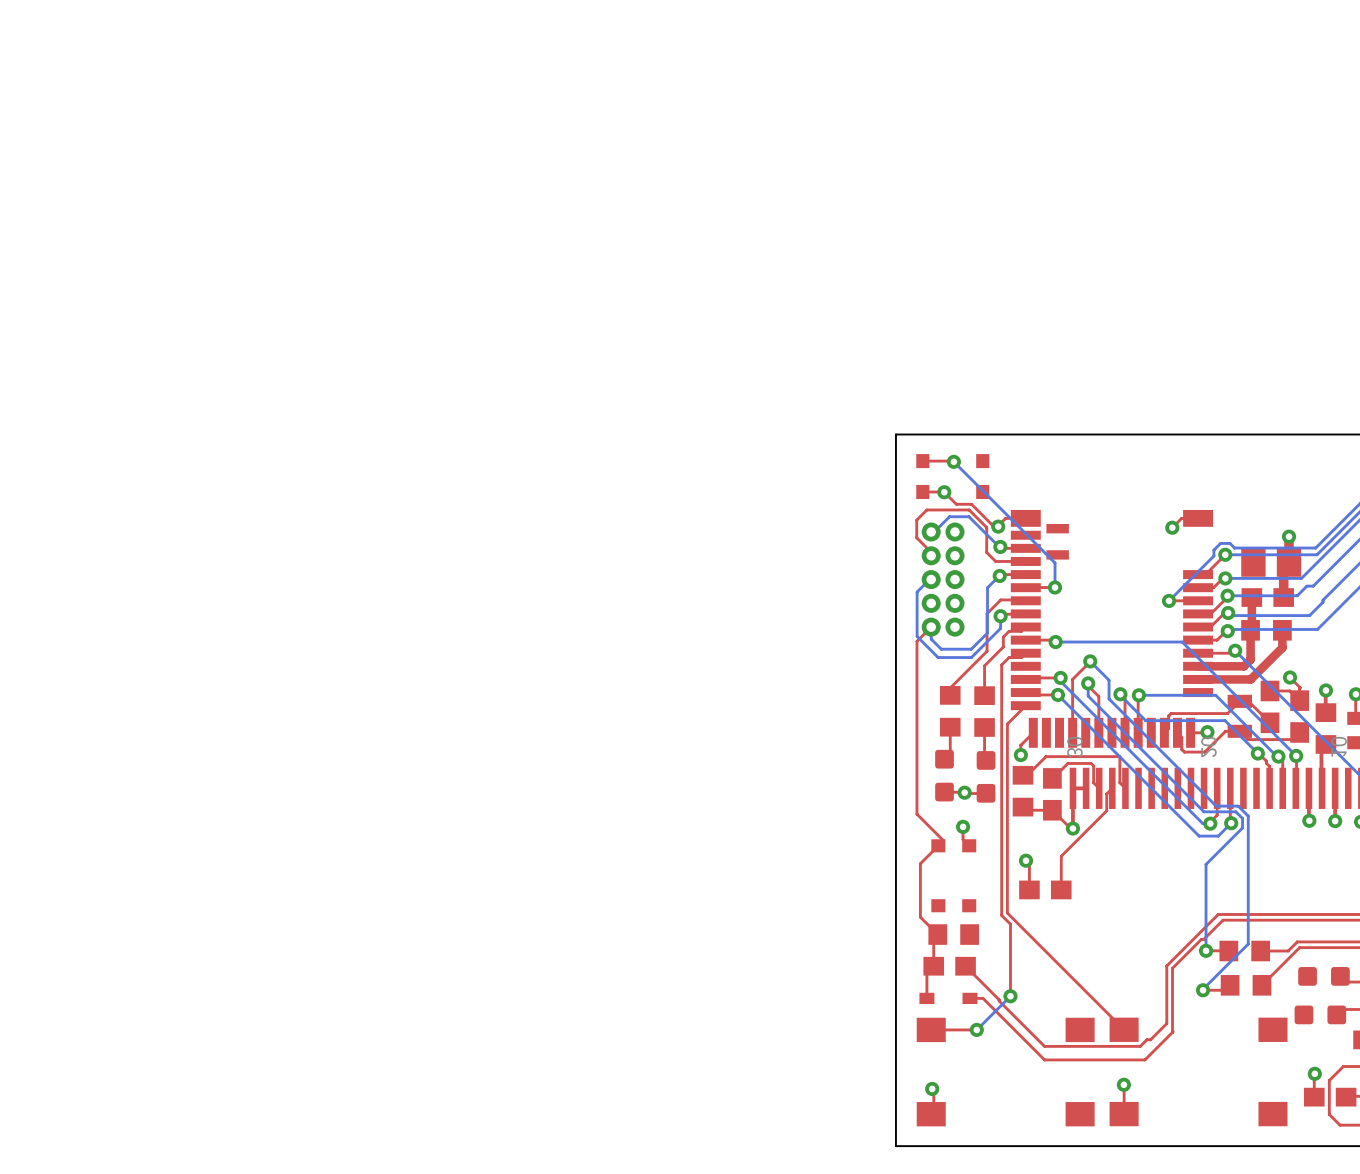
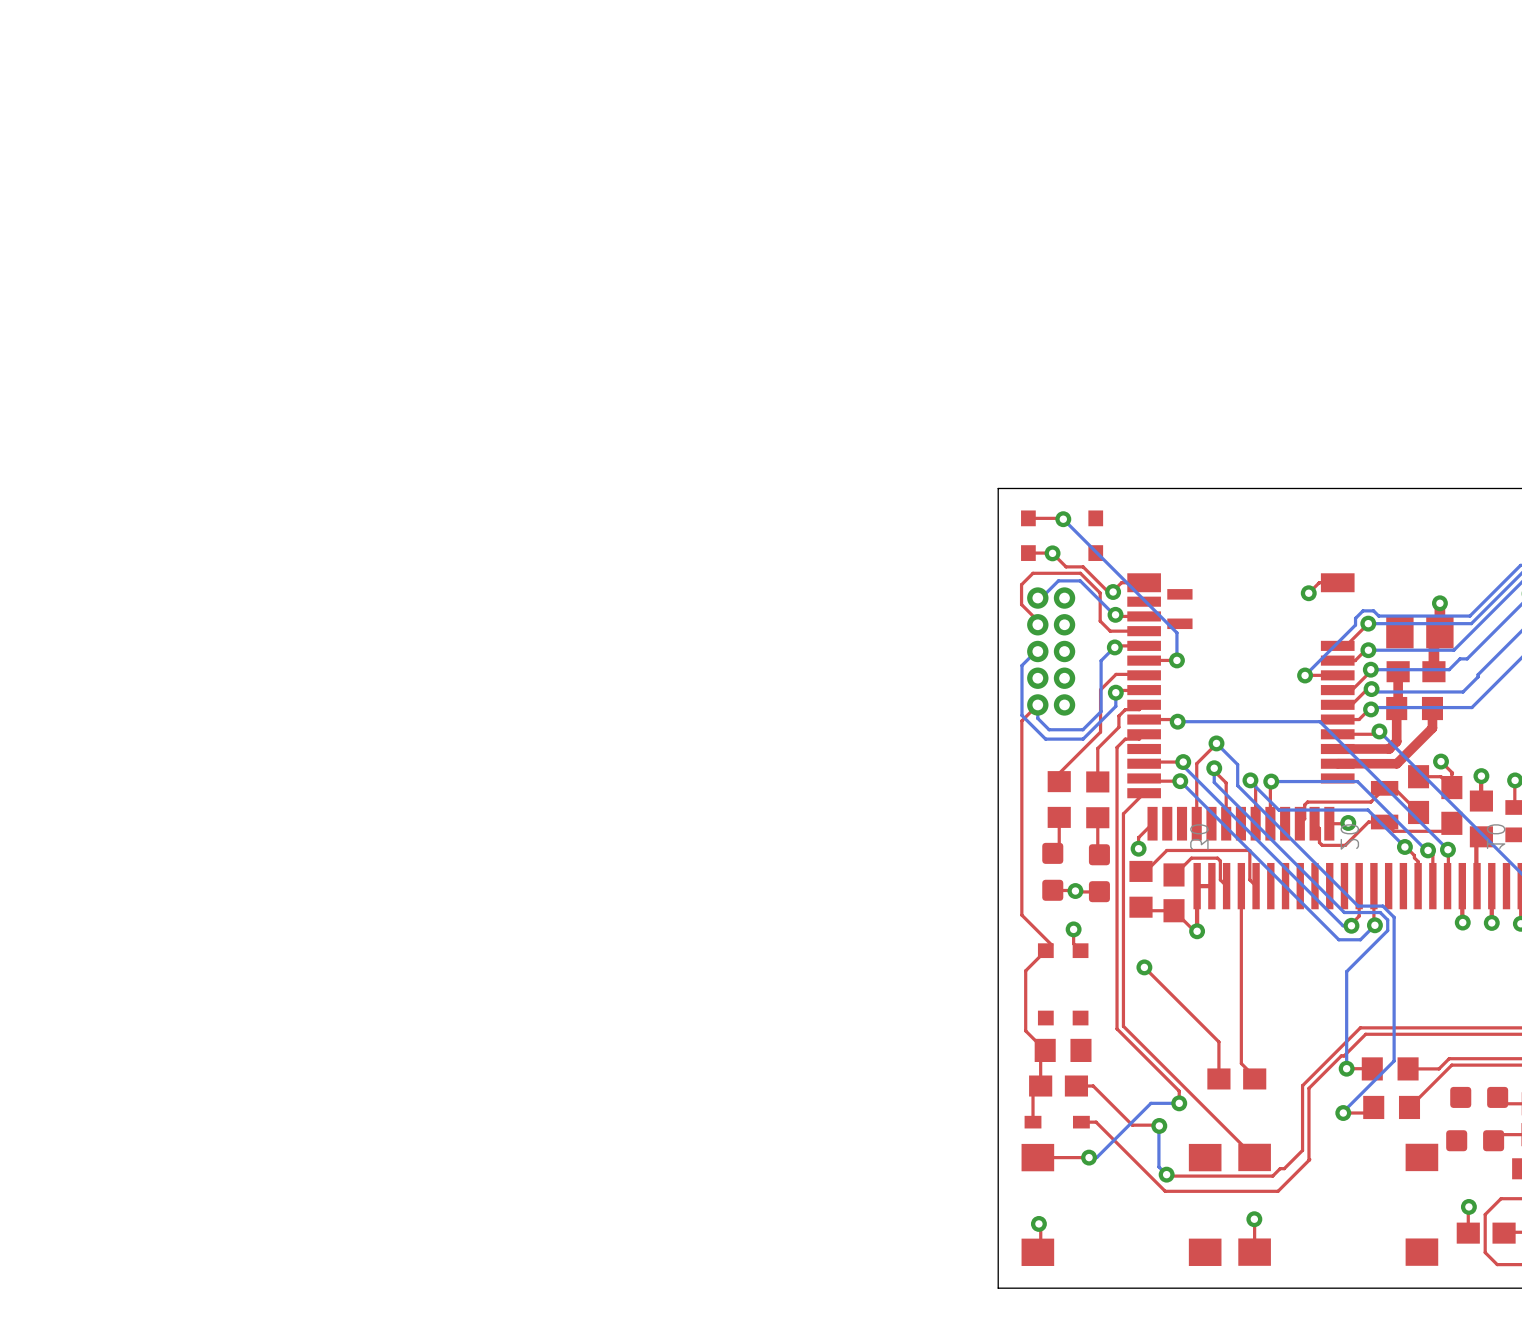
top track: (1112, 788) (1106, 793) (1106, 810) (1061, 856) (1061, 889) -> (1241, 886) (1241, 1063) (1254, 1078)
top track: (1029, 864) (1029, 889) -> (1148, 971) (1218, 1041) (1218, 1078)
part position: (1045, 889) -> (1236, 1078)
top track: (1010, 924) (1010, 996) -> (1126, 1038) (1179, 1091) (1179, 1103)
top track: (965, 966) (1044, 1046) -> (1076, 1086) (1093, 1086) (1132, 1125) (1159, 1125)
via: none -> (1179, 1103)
bottom track: (1010, 996) (976, 1029) -> (1179, 1103) (1150, 1103) (1096, 1157) (1089, 1157)
via: (1010, 996) -> none
bottom track: none -> (1159, 1125) (1158, 1166) (1166, 1174)
via: none -> (1159, 1125)
via: none -> (1166, 1174)

